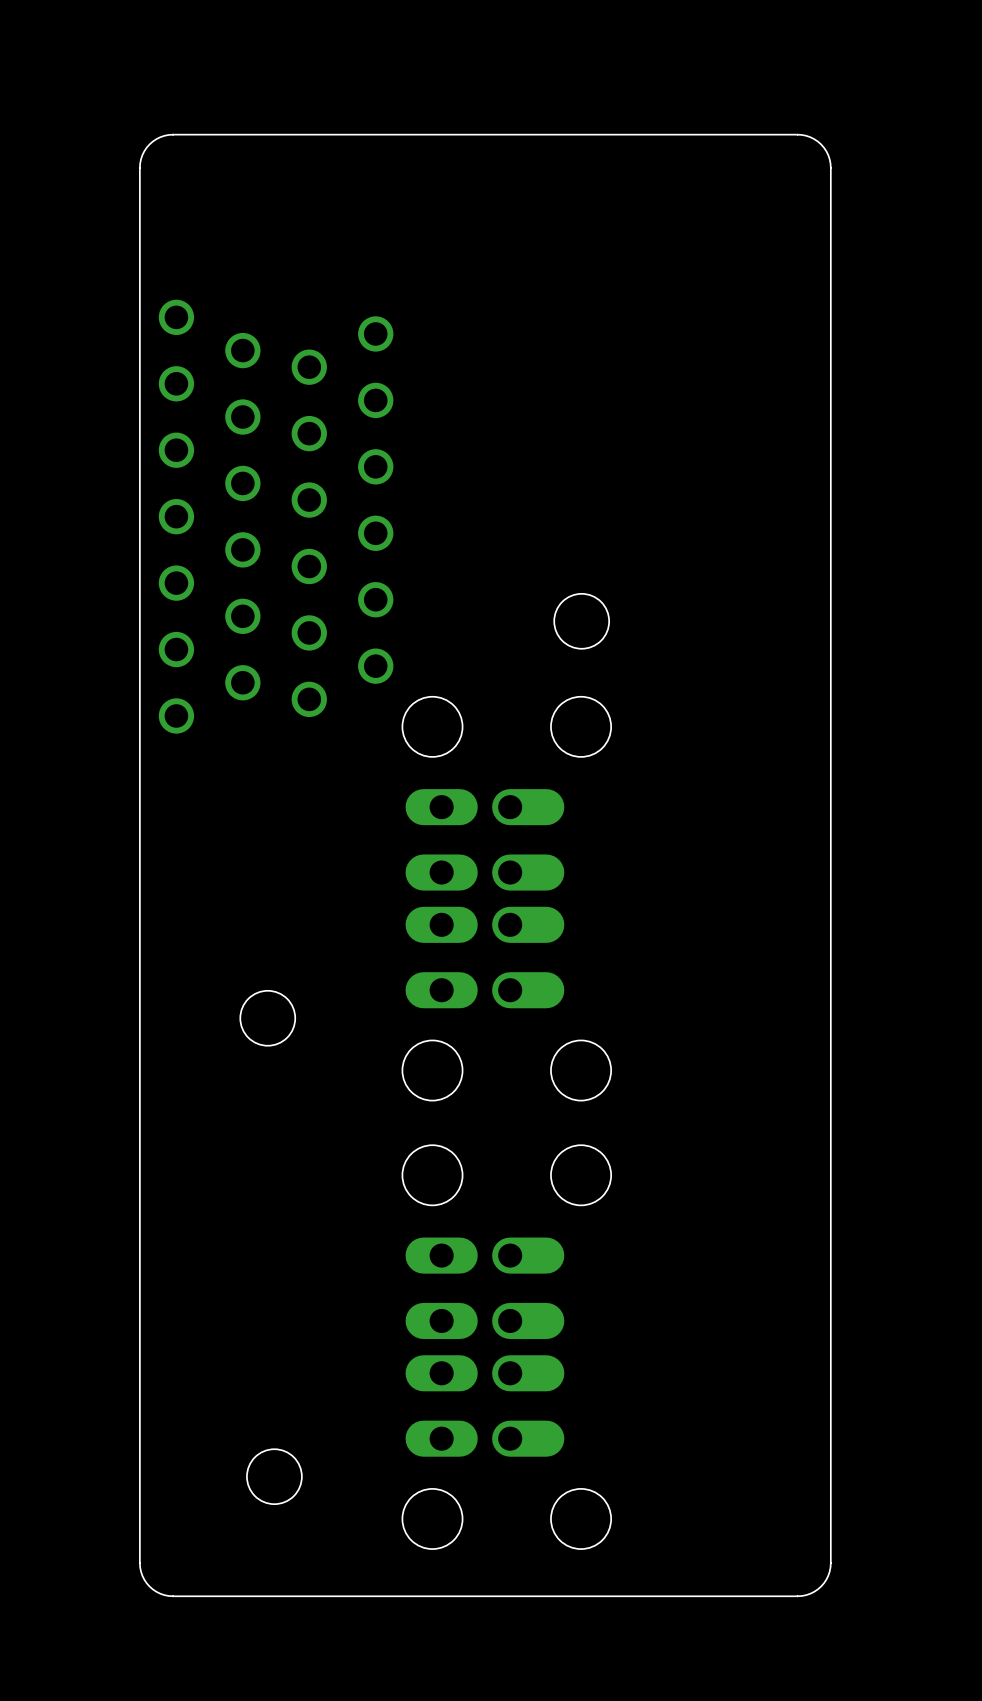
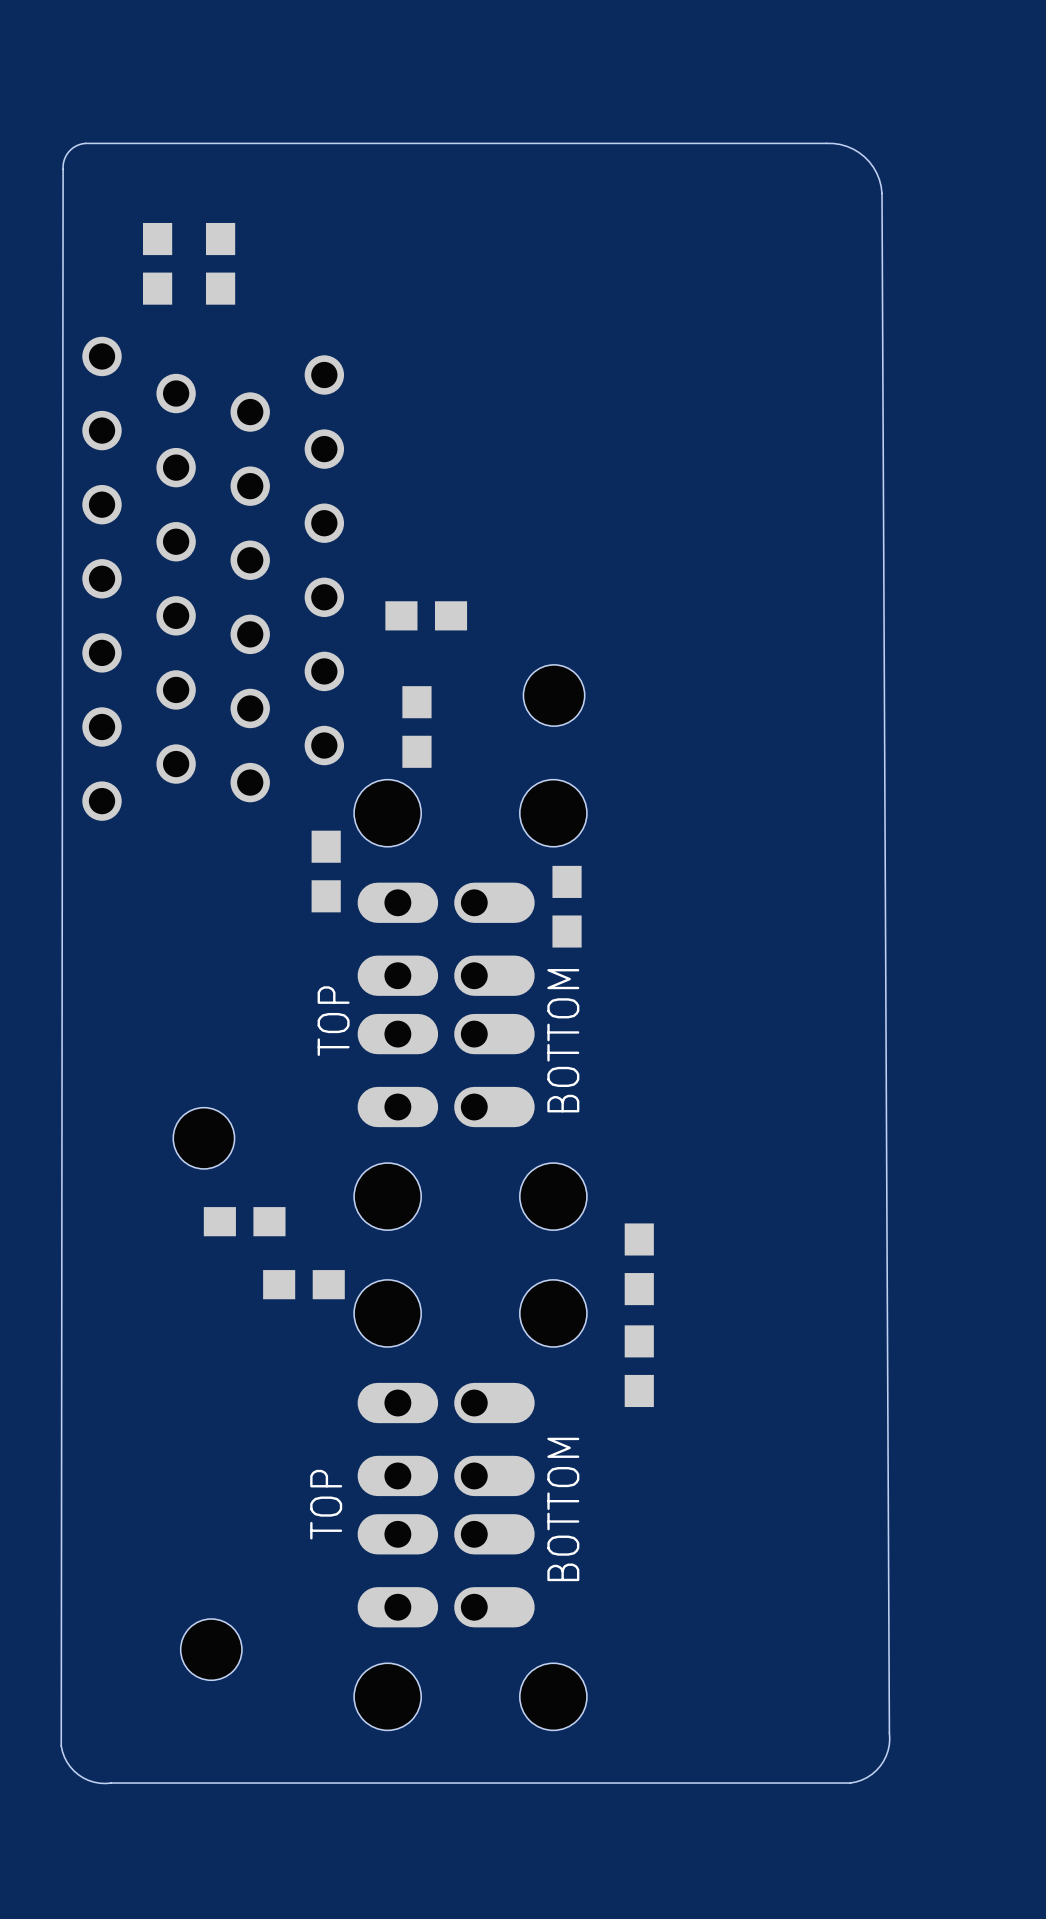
part: none -> (157, 263)
part: none -> (220, 263)
part: none -> (426, 615)
part: none -> (416, 727)
part: none -> (326, 871)
part: none -> (567, 906)
text: none -> TOP (333, 1021)
text: none -> BOTTOM (563, 1040)
part: none -> (244, 1221)
part: none -> (639, 1264)
part: none -> (303, 1284)
part: none -> (639, 1366)
text: none -> TOP (326, 1504)
text: none -> BOTTOM (563, 1509)
board edge: (797, 1596) (810, 1593) (821, 1586) (828, 1575) (830, 1563) (830, 167) (828, 155) (823, 147) (814, 139) (797, 134) (173, 134) (160, 137) (149, 144) (142, 155) (139, 167) (139, 1563) (144, 1579) (152, 1589) (164, 1595) (184, 1596) -> (794, 1783) (850, 1783) (861, 1780) (871, 1774) (880, 1766) (886, 1755) (889, 1738) (881, 193) (876, 173) (864, 156) (846, 146) (833, 143) (85, 143) (73, 147) (65, 157) (63, 166) (61, 1745) (67, 1762) (78, 1774) (94, 1782) (111, 1783)

